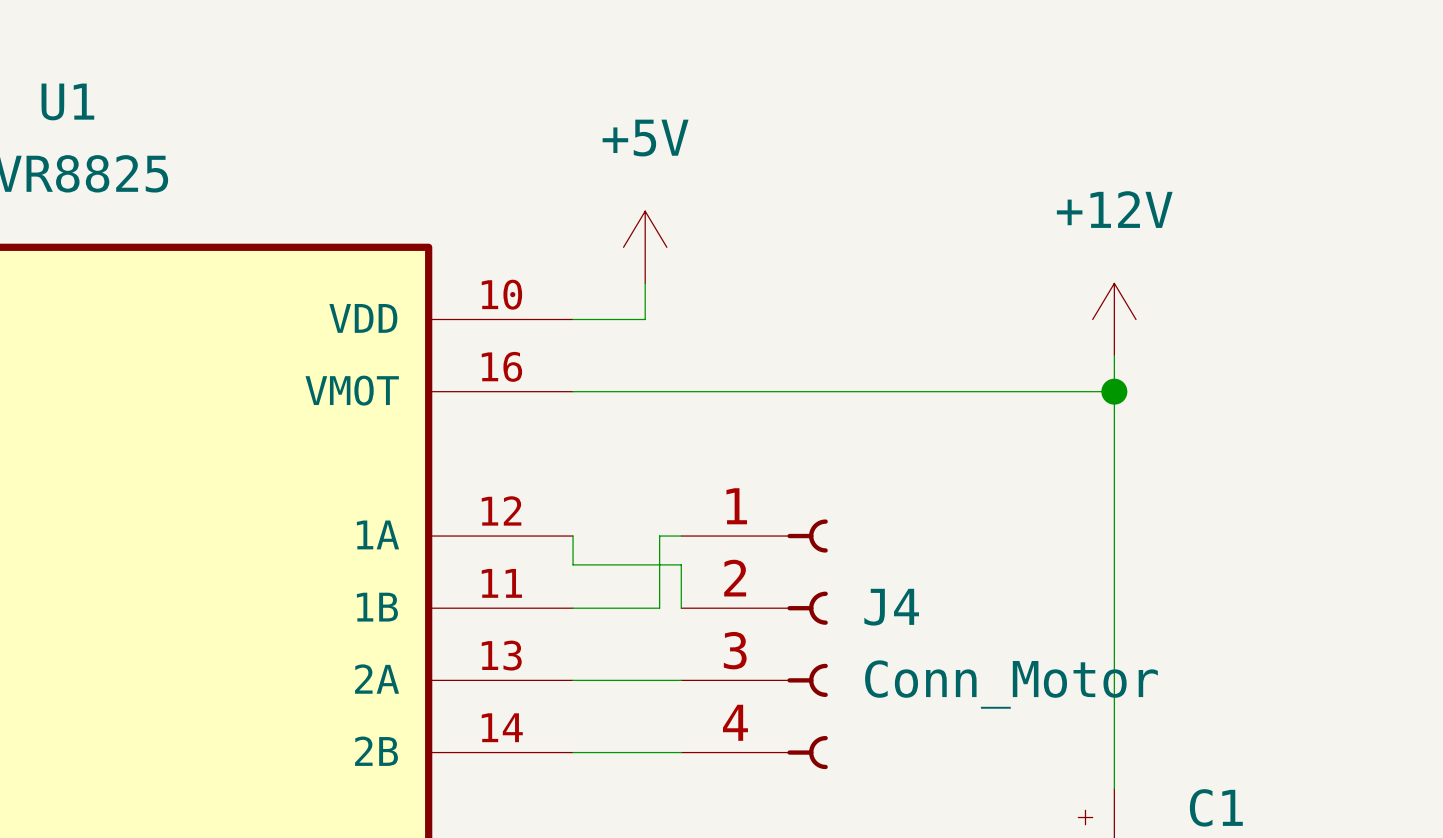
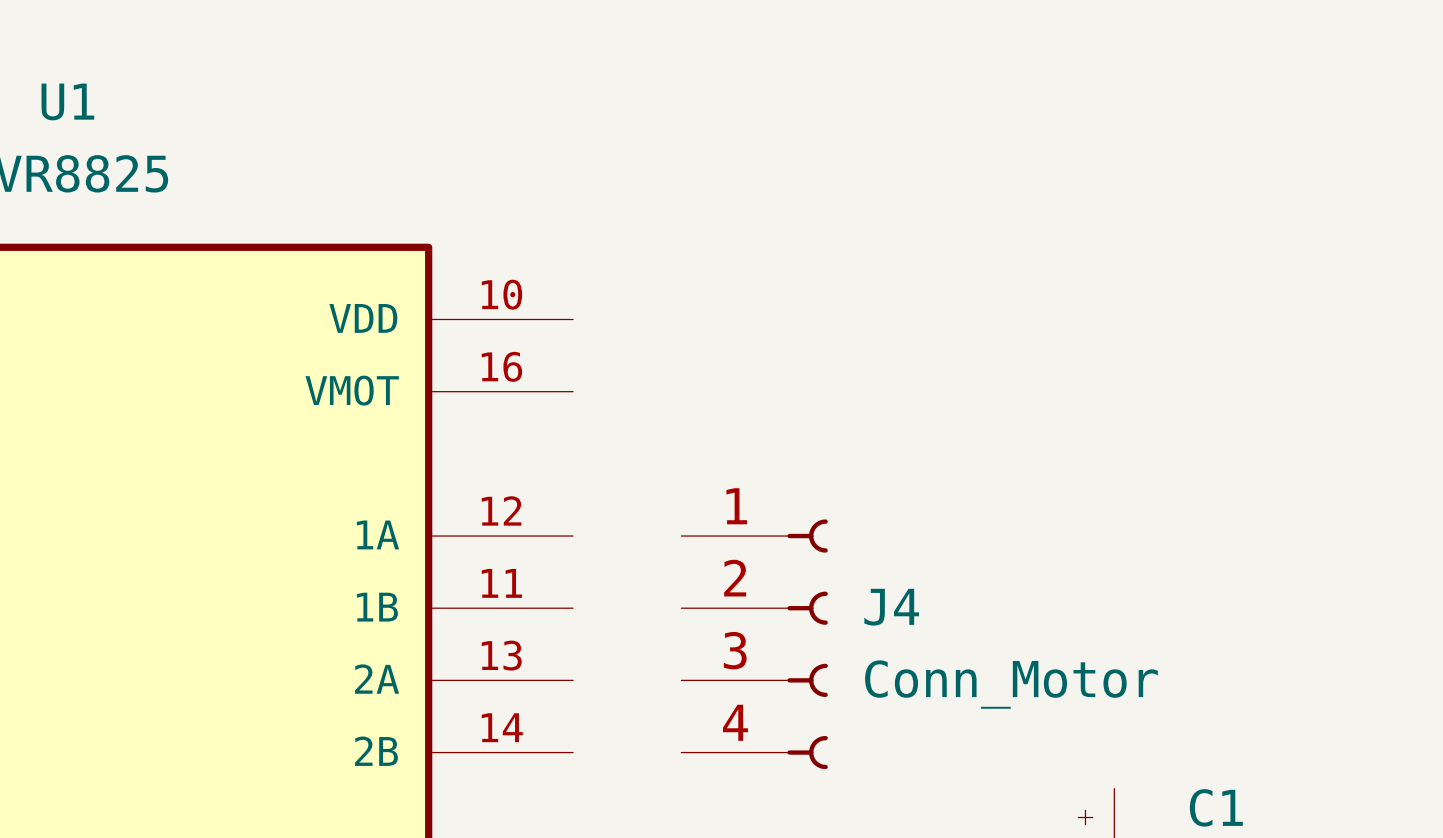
power symbol: +5V (645, 247) -> none
wire: (645, 283) (645, 319) (573, 319) -> none
power symbol: +12V (1114, 319) -> none
wire: (1114, 355) (1114, 788) -> none
wire: (573, 391) (1114, 391) -> none
junction: (1114, 391) -> none
wire: (573, 536) (573, 564) (681, 564) (681, 608) -> none
wire: (681, 536) (659, 536) (659, 608) (573, 608) -> none
wire: (573, 680) (681, 680) -> none
wire: (573, 752) (681, 752) -> none

